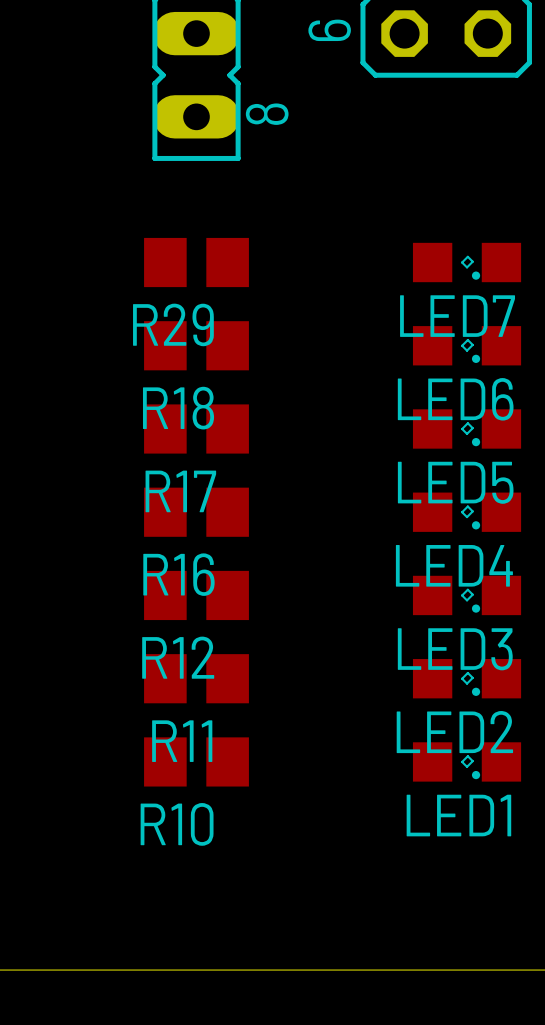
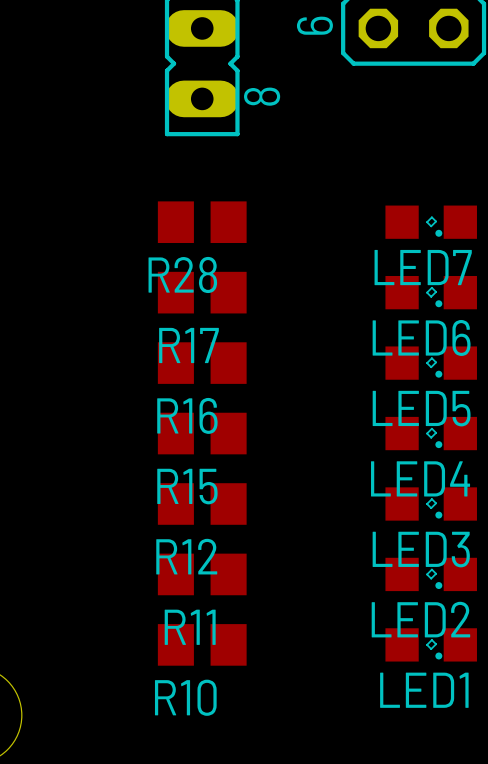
R29 name: R29 (173, 324) -> R28 (182, 274)
R18 name: R18 (178, 408) -> R17 (188, 345)
R17 name: R17 (180, 491) -> R16 (187, 415)
R16 name: R16 (178, 574) -> R15 (187, 486)

